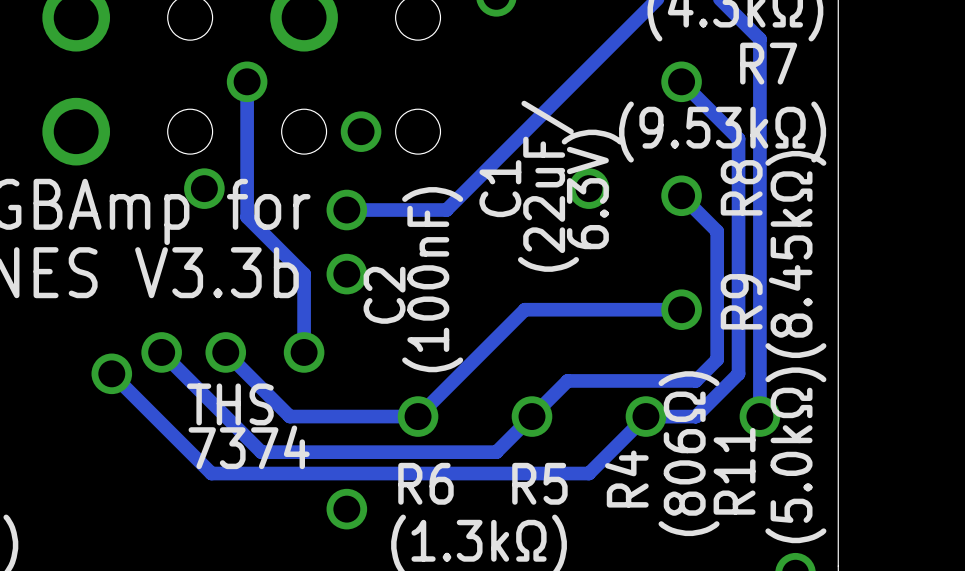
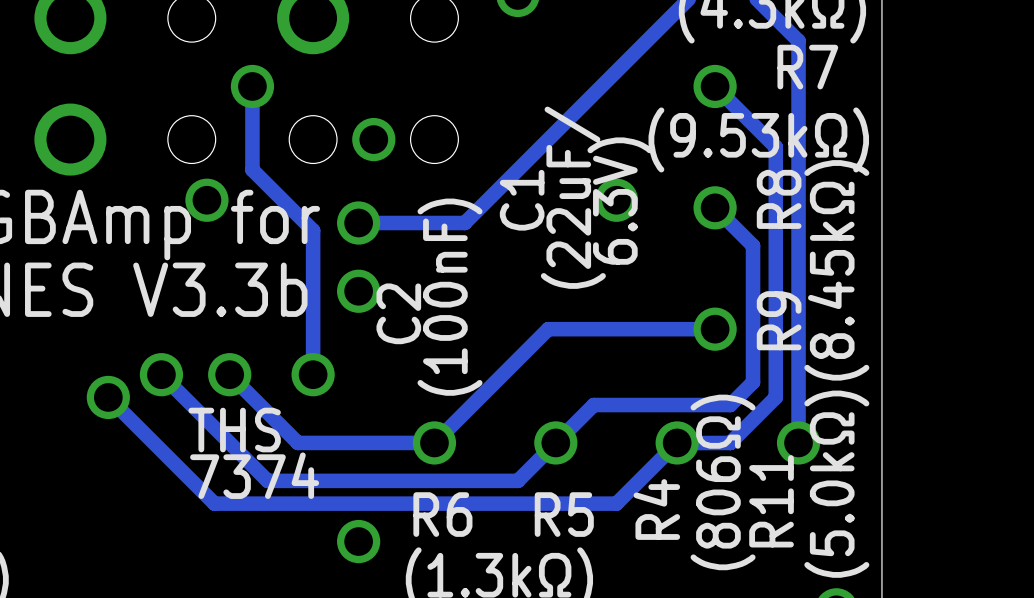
track: (247, 160) (247, 217) (304, 274) -> (252, 169) (313, 230) (313, 291)

